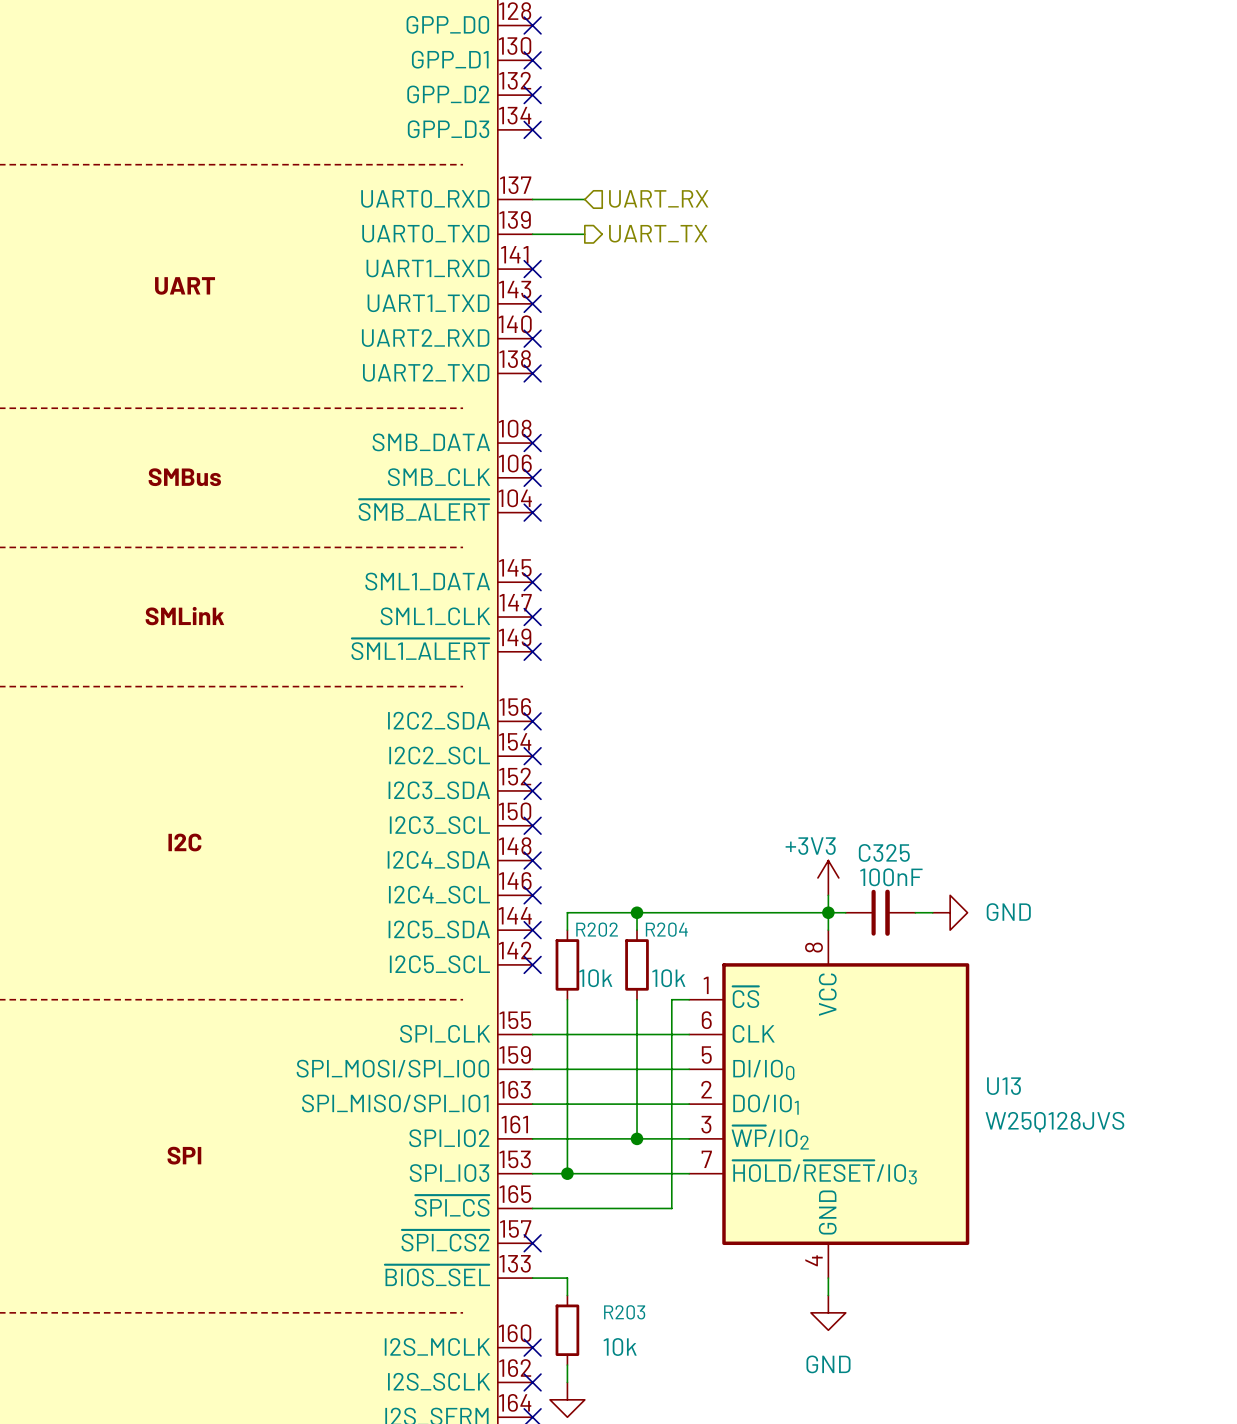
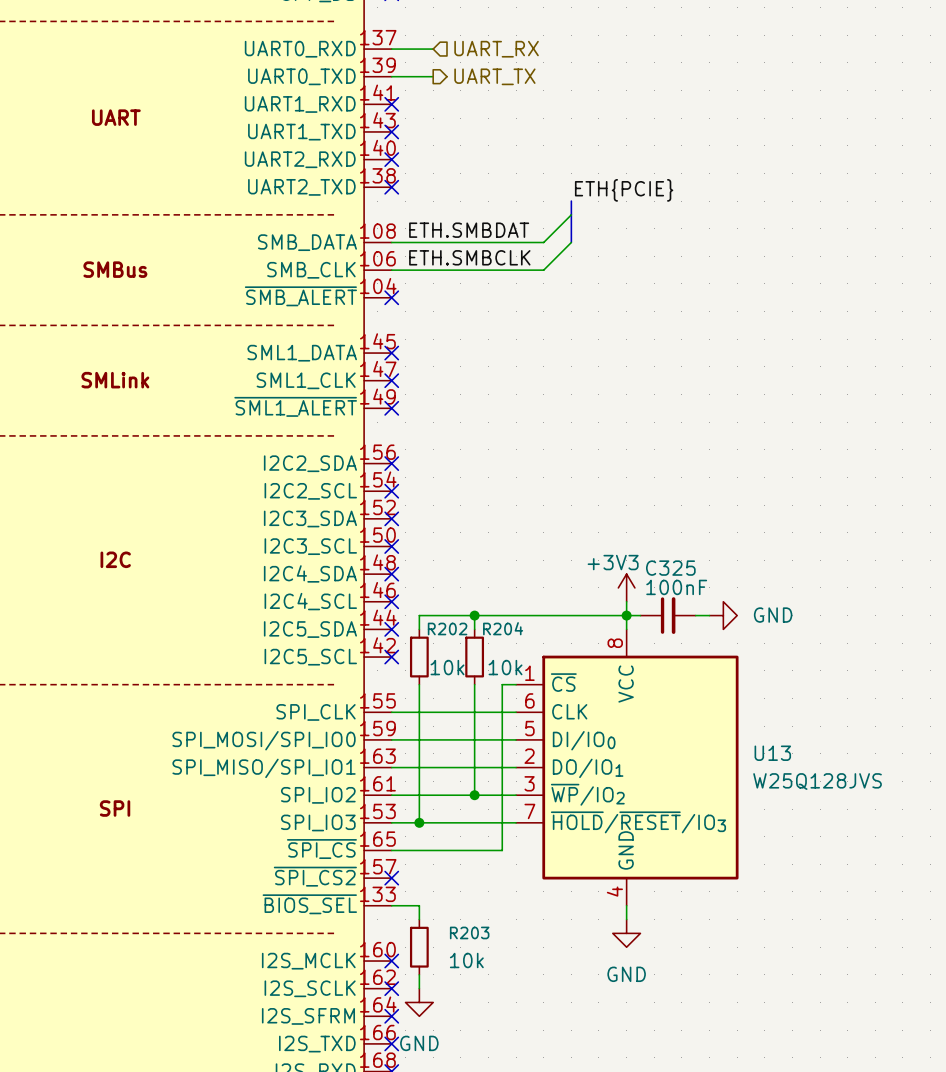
label: none -> ETH{PCIE} (624, 190)
bus: none -> (571, 201) (571, 242)
wire: none -> (571, 214) (543, 242) (391, 242)
label: none -> ETH.SMBDAT (469, 230)
no-connect mark: (532, 443) -> none
wire: none -> (571, 242) (543, 270) (391, 270)
label: none -> ETH.SMBCLK (469, 257)
no-connect mark: (532, 477) -> none

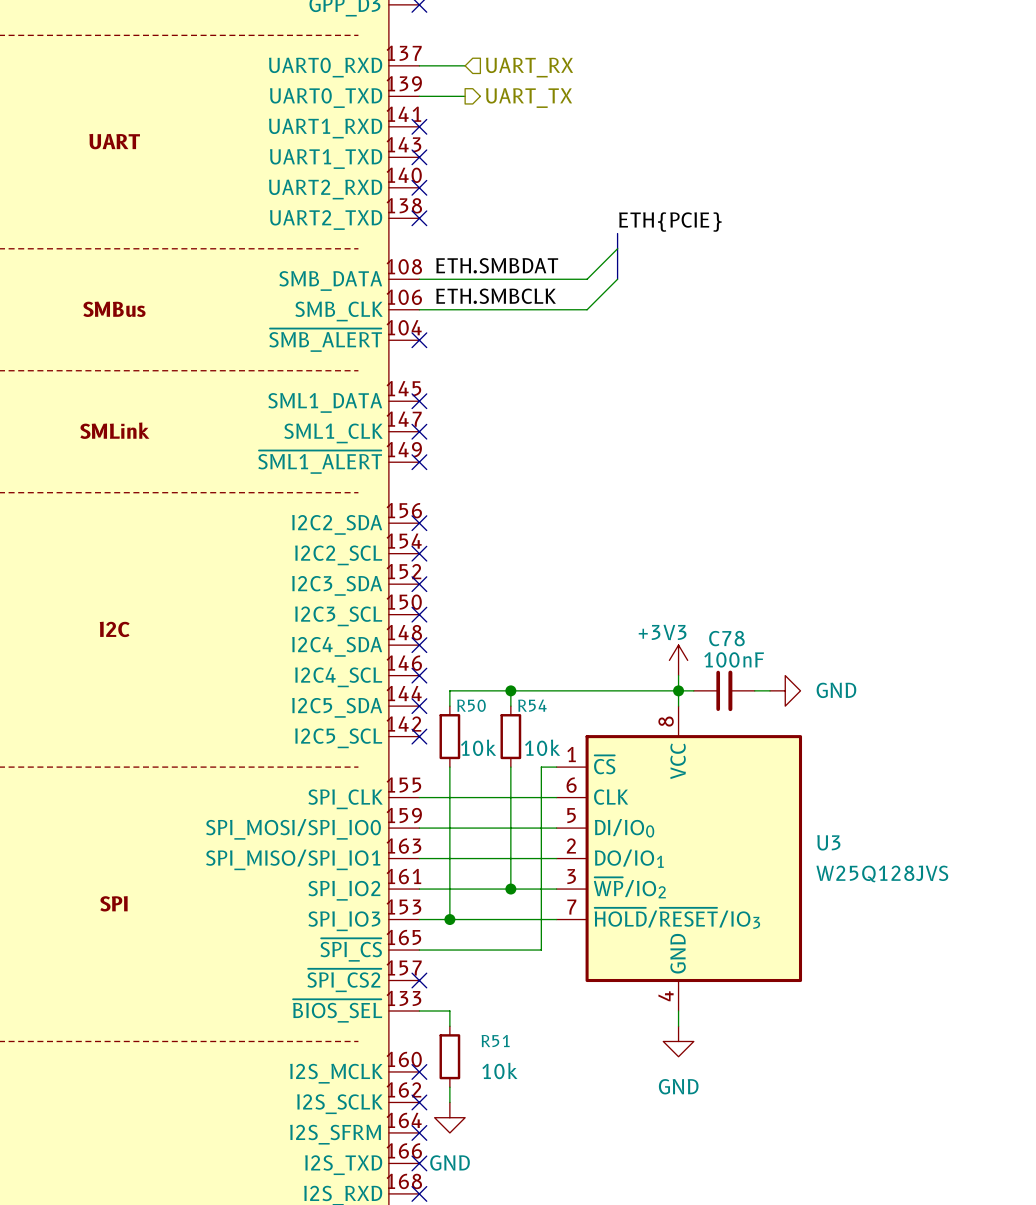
C325 name: C325 (670, 568) -> C78 (726, 638)
R202 name: R202 (447, 628) -> R50 (471, 705)
R204 name: R204 (503, 628) -> R54 (532, 705)
U13 name: U13 (772, 753) -> U3 (828, 842)
R203 name: R203 (469, 932) -> R51 (495, 1041)

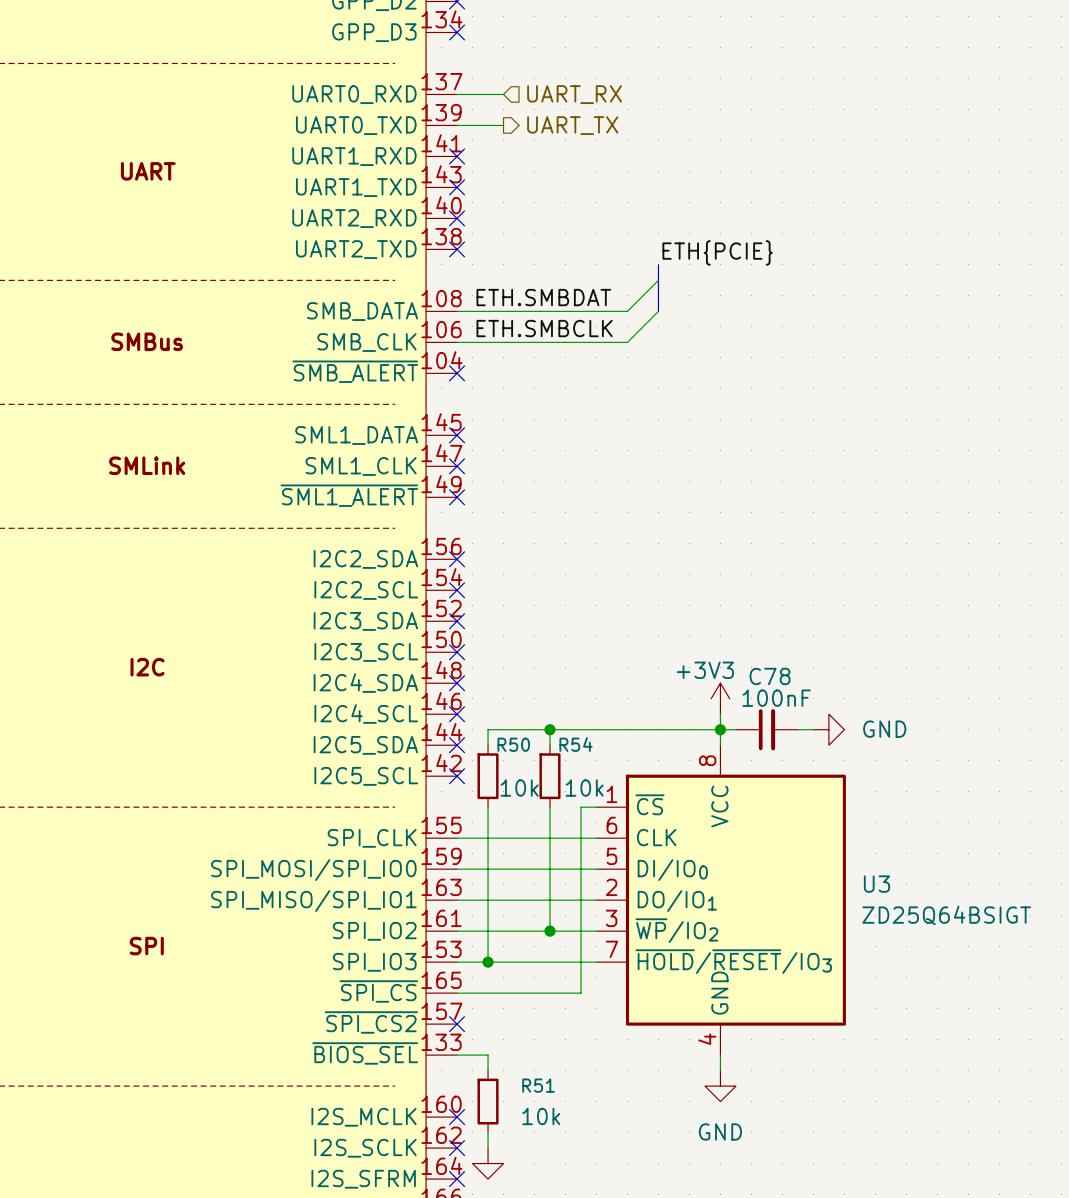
U3 value: W25Q128JVS (882, 873) -> ZD25Q64BSIGT (946, 915)

